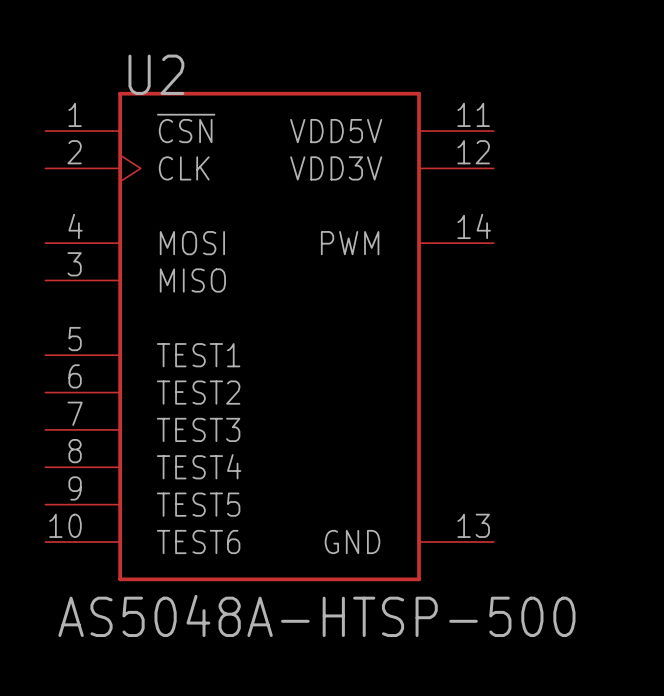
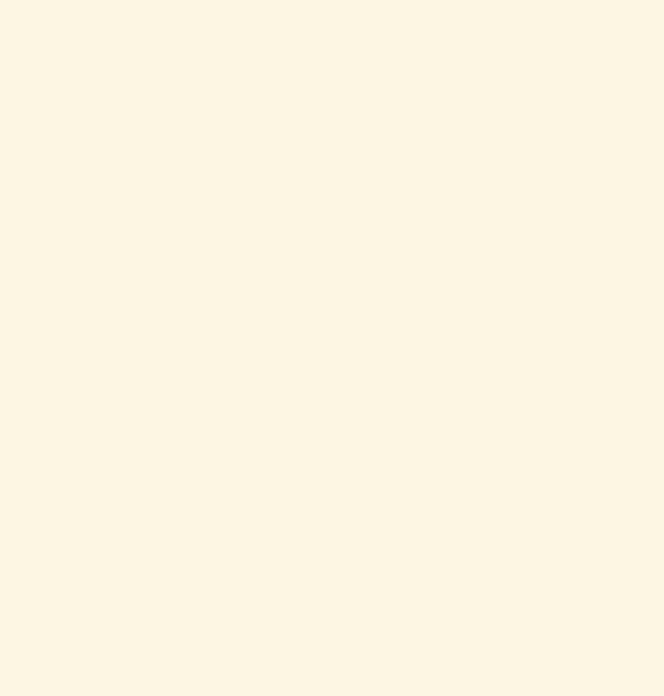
U2: AS5048A-HTSP-500 (269, 336) -> none

